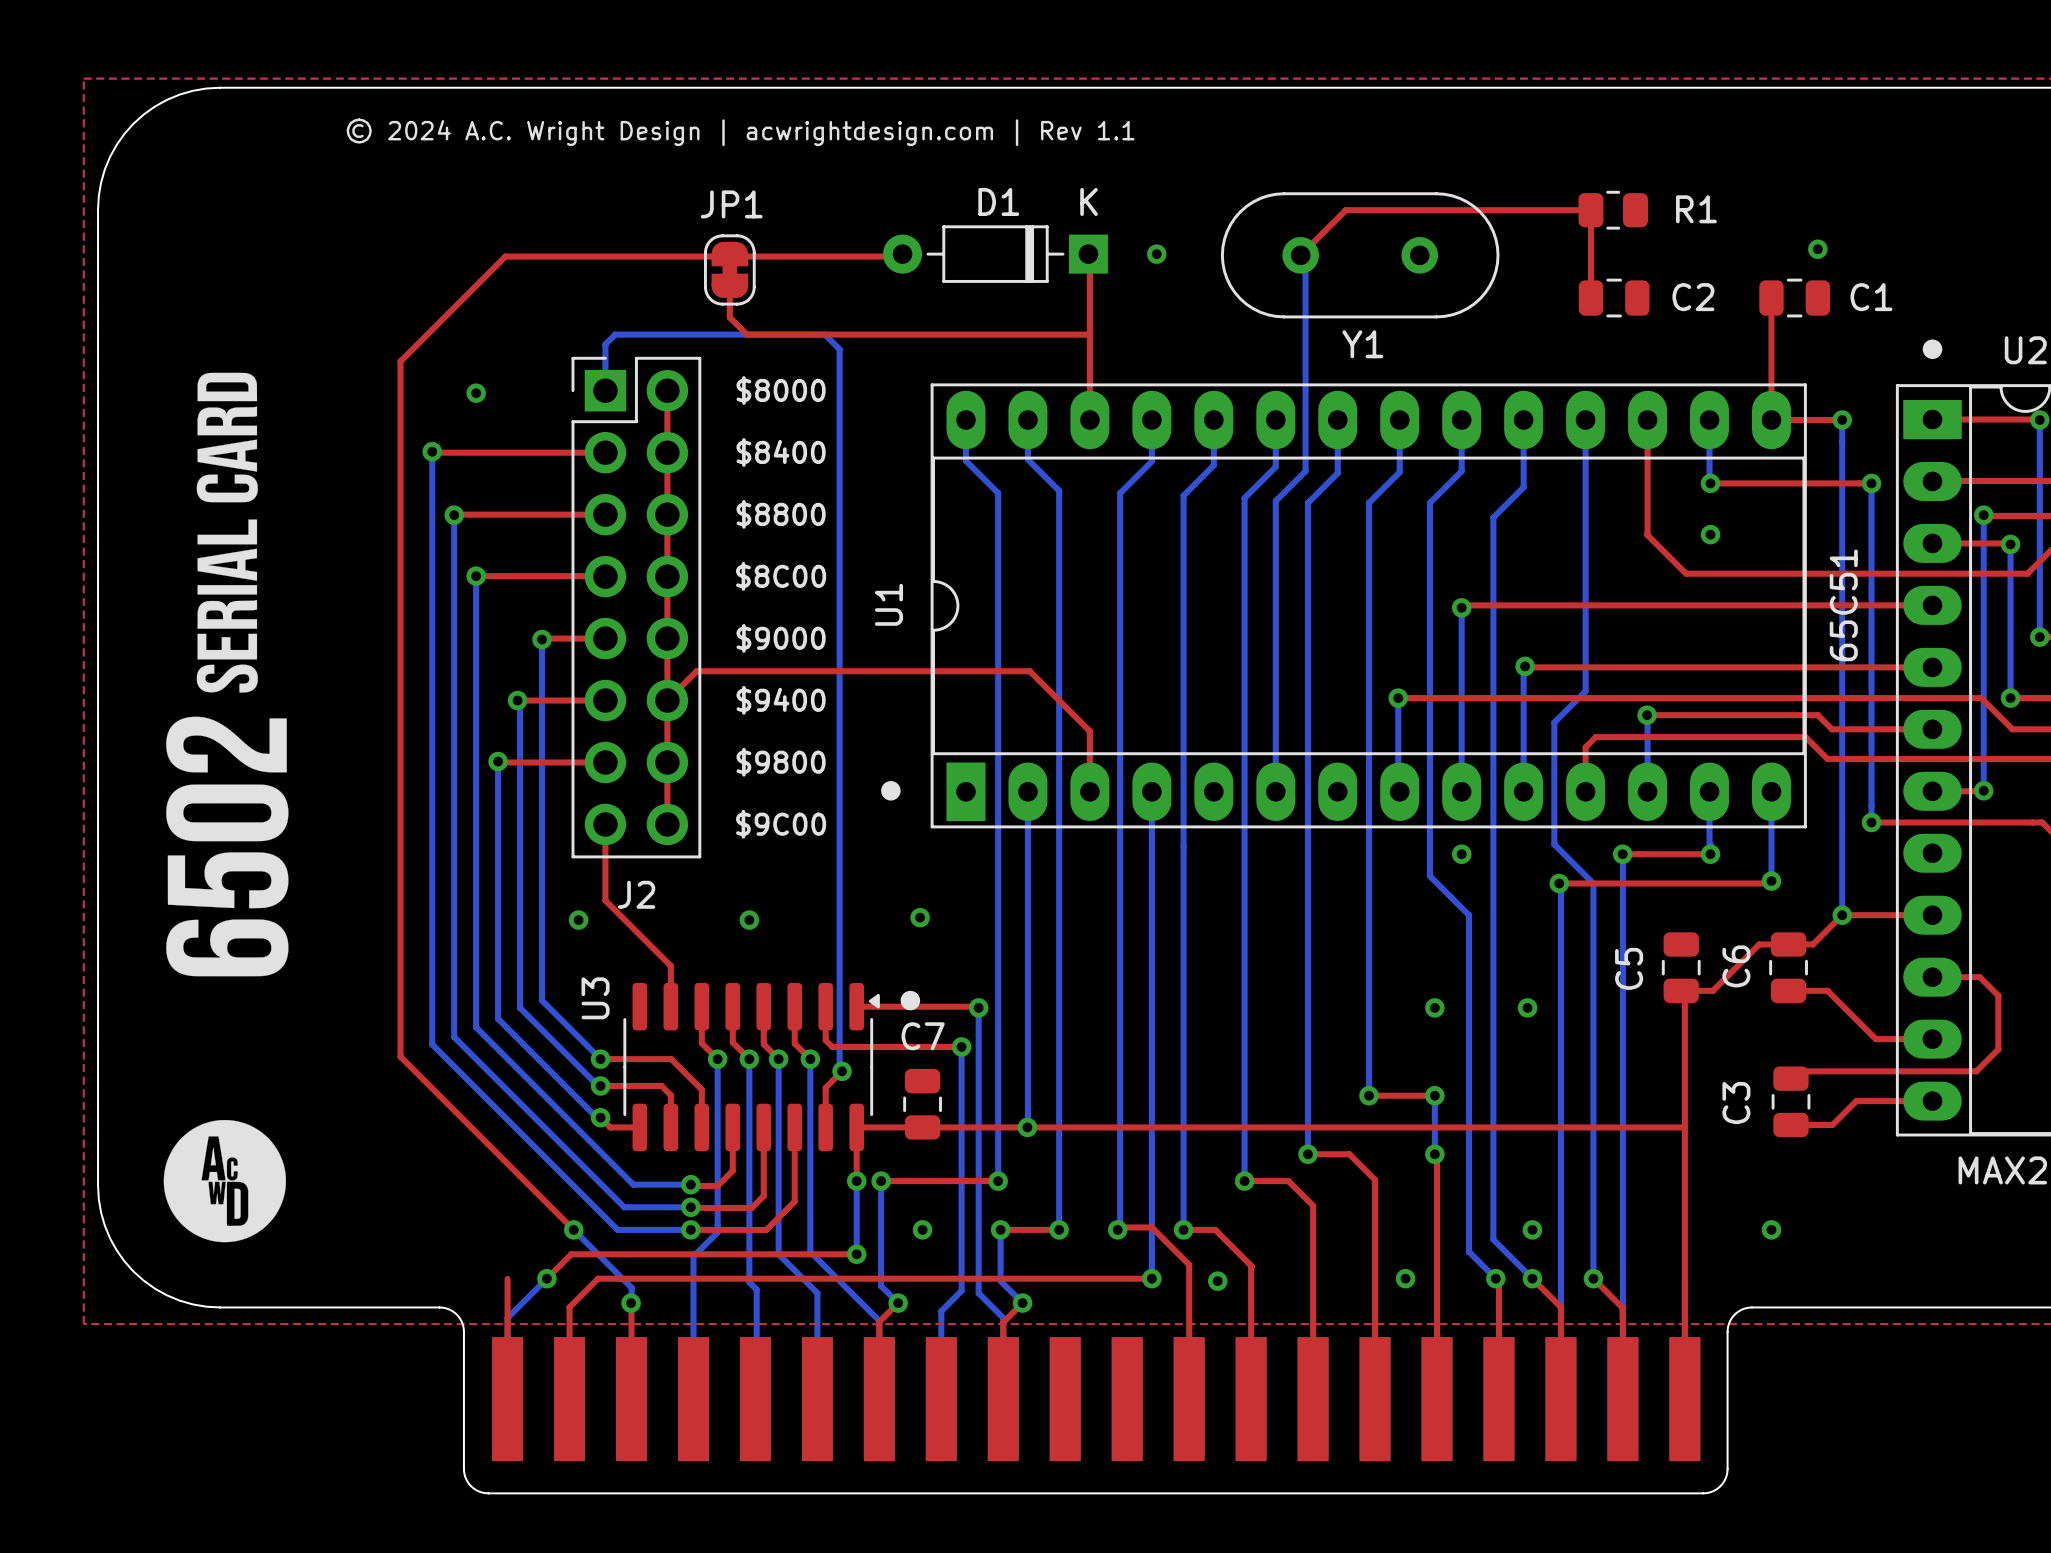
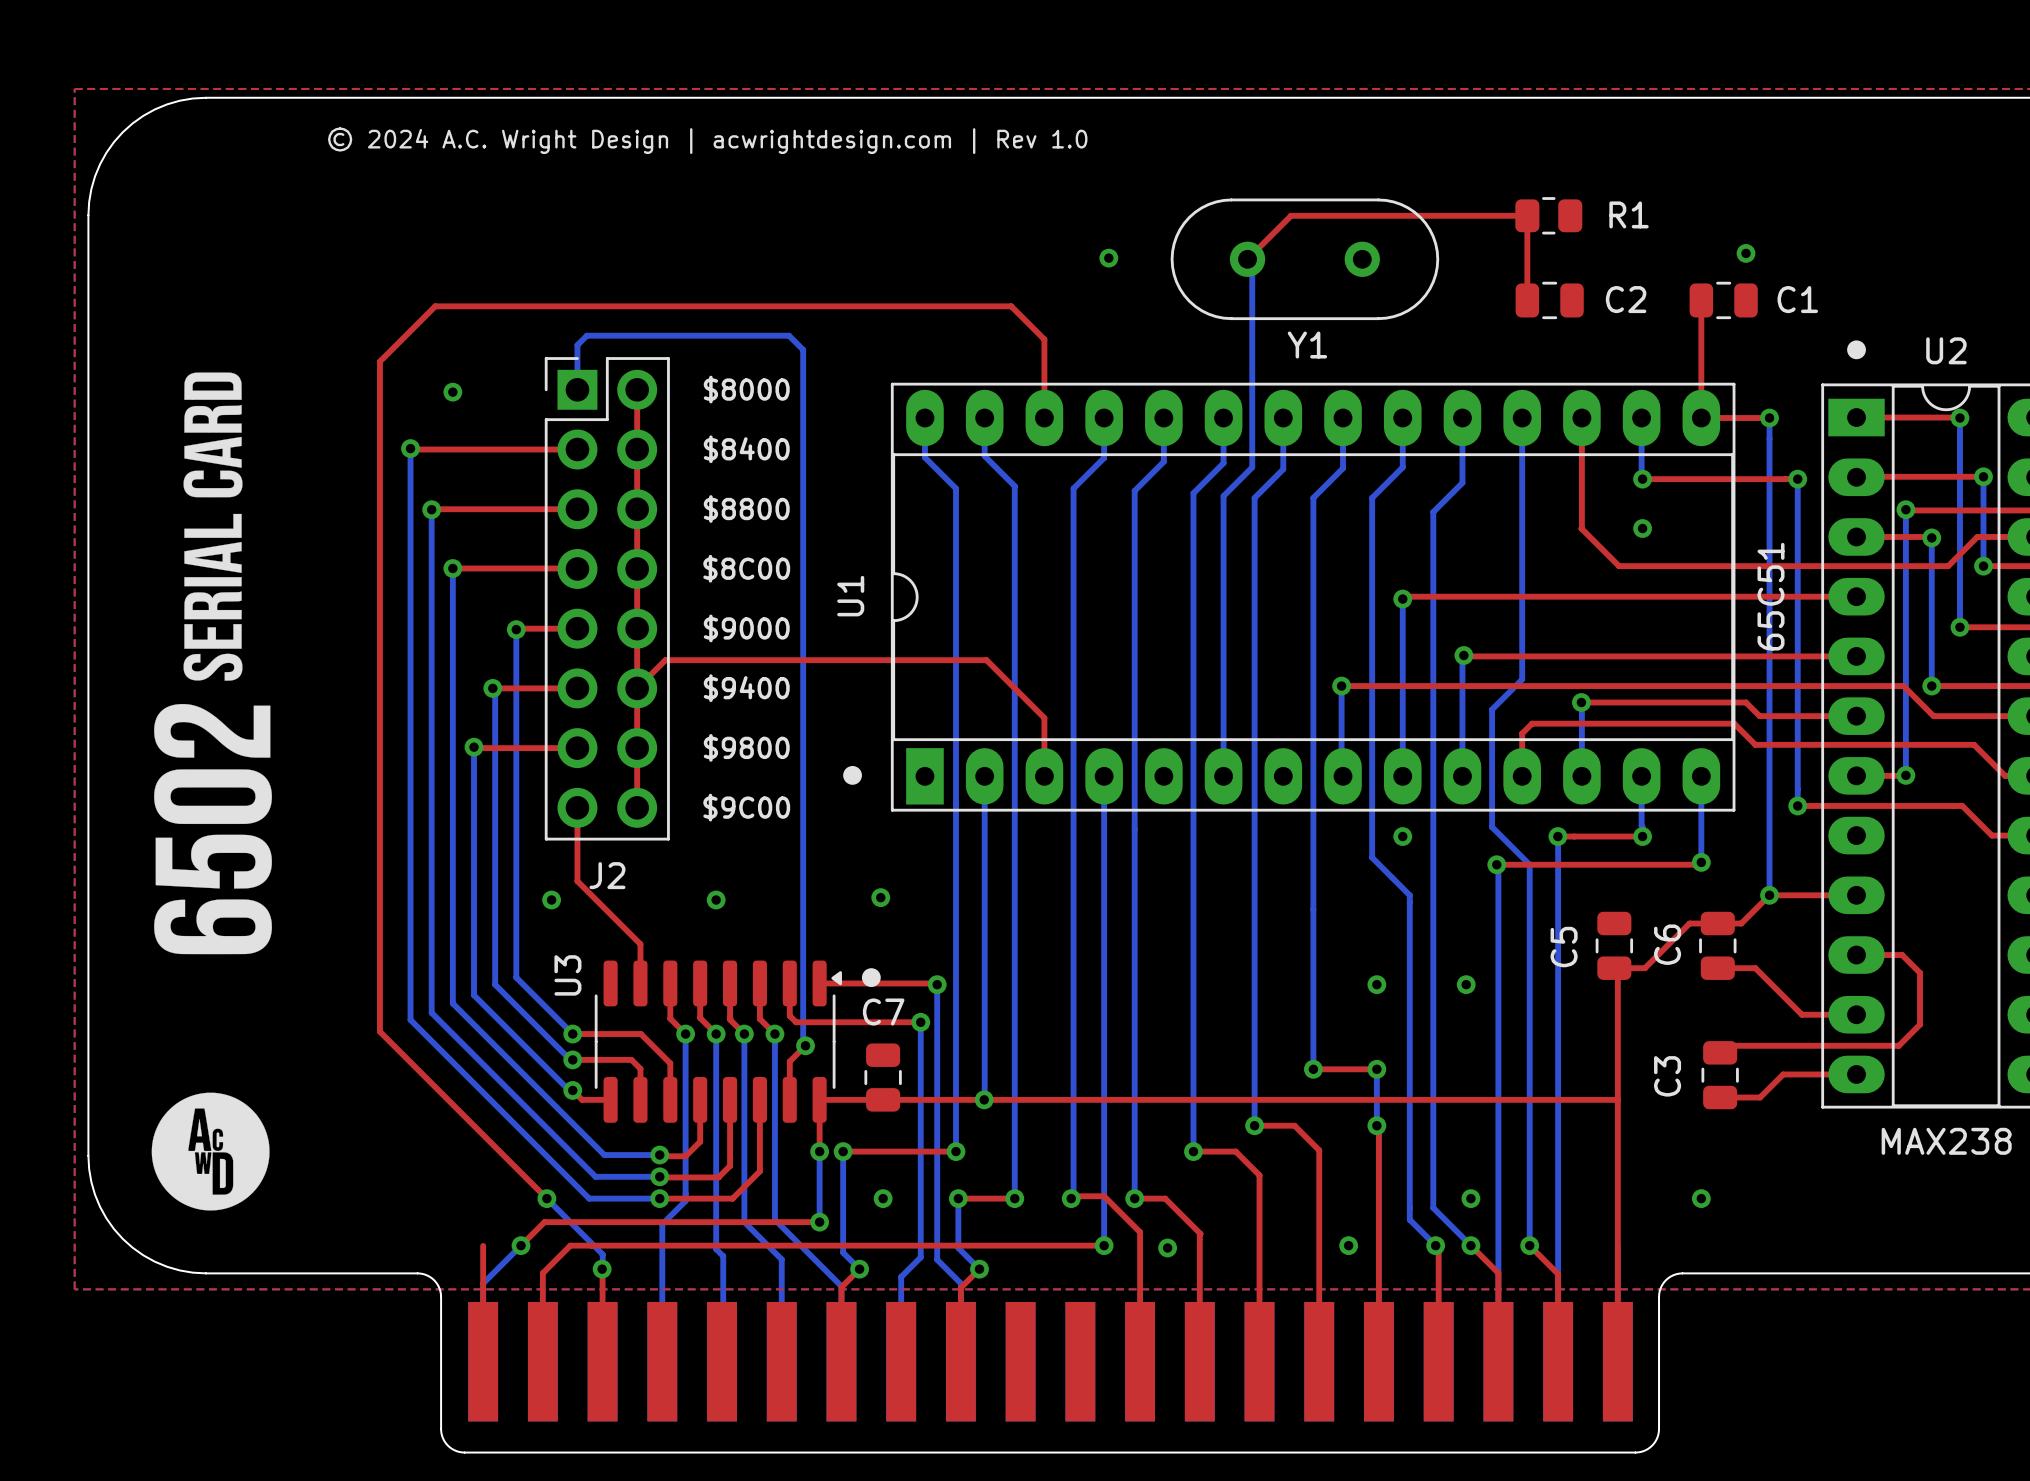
text: © 2024 A.C. Wright Design | acwrightdesign.com | Rev 1.1 (740, 132) -> © 2024 A.C. Wright Design | acwrightdesign.com | Rev 1.0 (707, 140)
top track: (1088, 251) (1089, 338) -> none
top track: (902, 254) (900, 256) (505, 256) (457, 304) -> (1044, 339) (1011, 306) (435, 306)
D1: (995, 254) -> none
JP1: (729, 269) -> none
top track: (729, 283) (729, 317) (746, 334) (1089, 334) -> none

